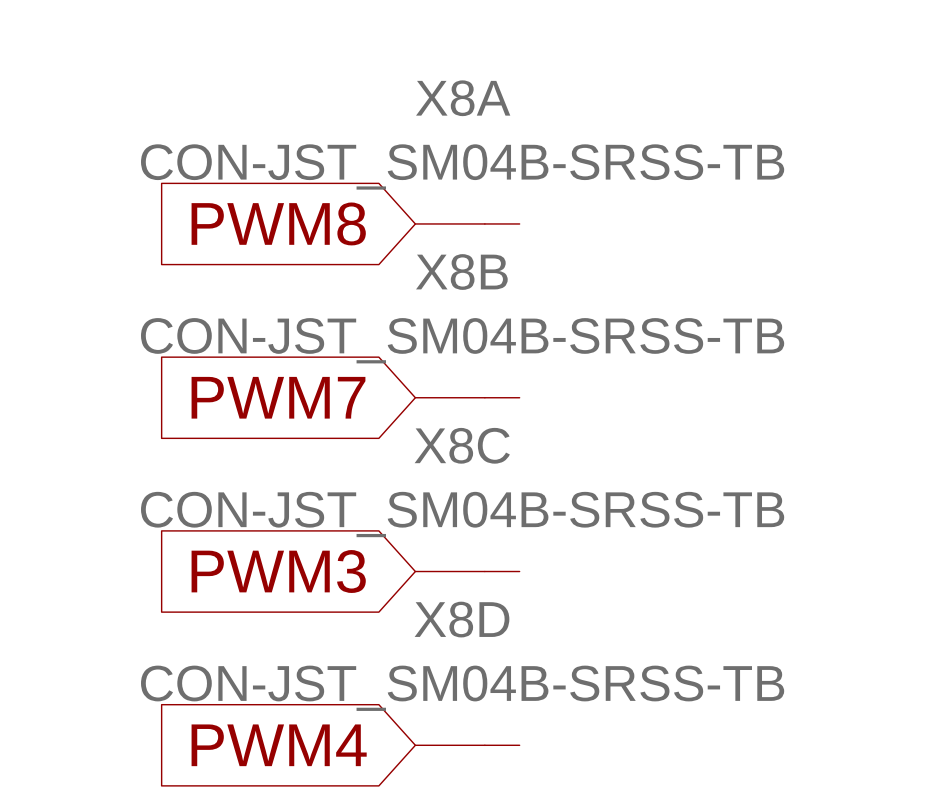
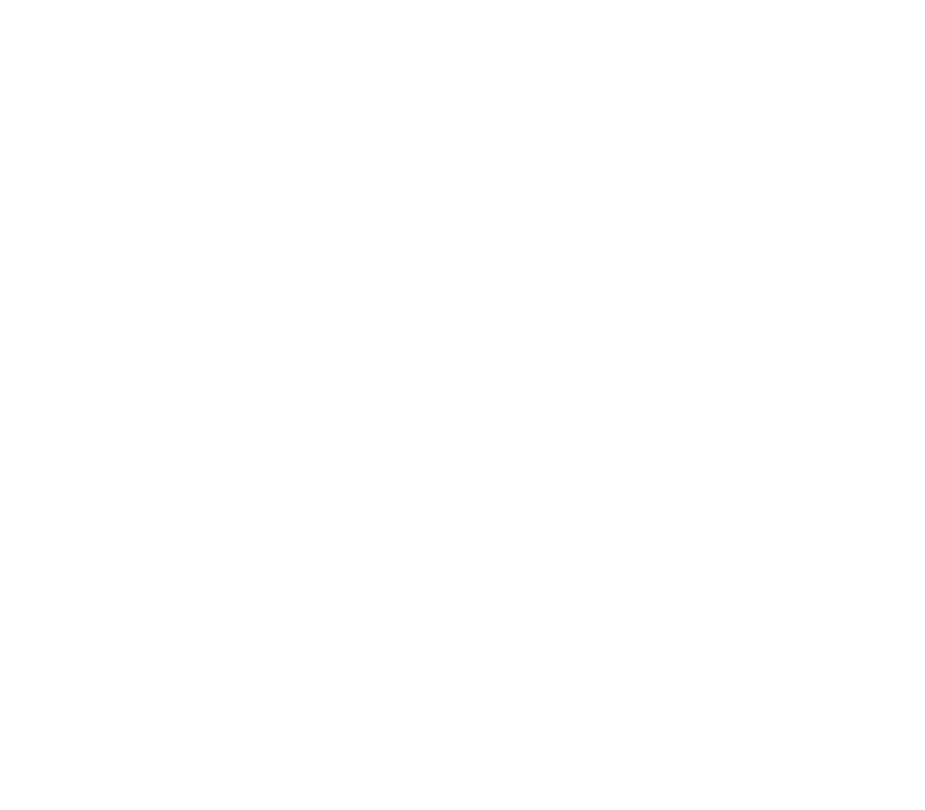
global label: PWM8 (278, 223) -> none
X8A: CON-JST_SM04B-SRSS-TB (467, 223) -> none
global label: PWM7 (278, 397) -> none
X8B: CON-JST_SM04B-SRSS-TB (467, 397) -> none
global label: PWM3 (278, 571) -> none
X8C: CON-JST_SM04B-SRSS-TB (467, 571) -> none
global label: PWM4 (279, 745) -> none
X8D: CON-JST_SM04B-SRSS-TB (467, 745) -> none

